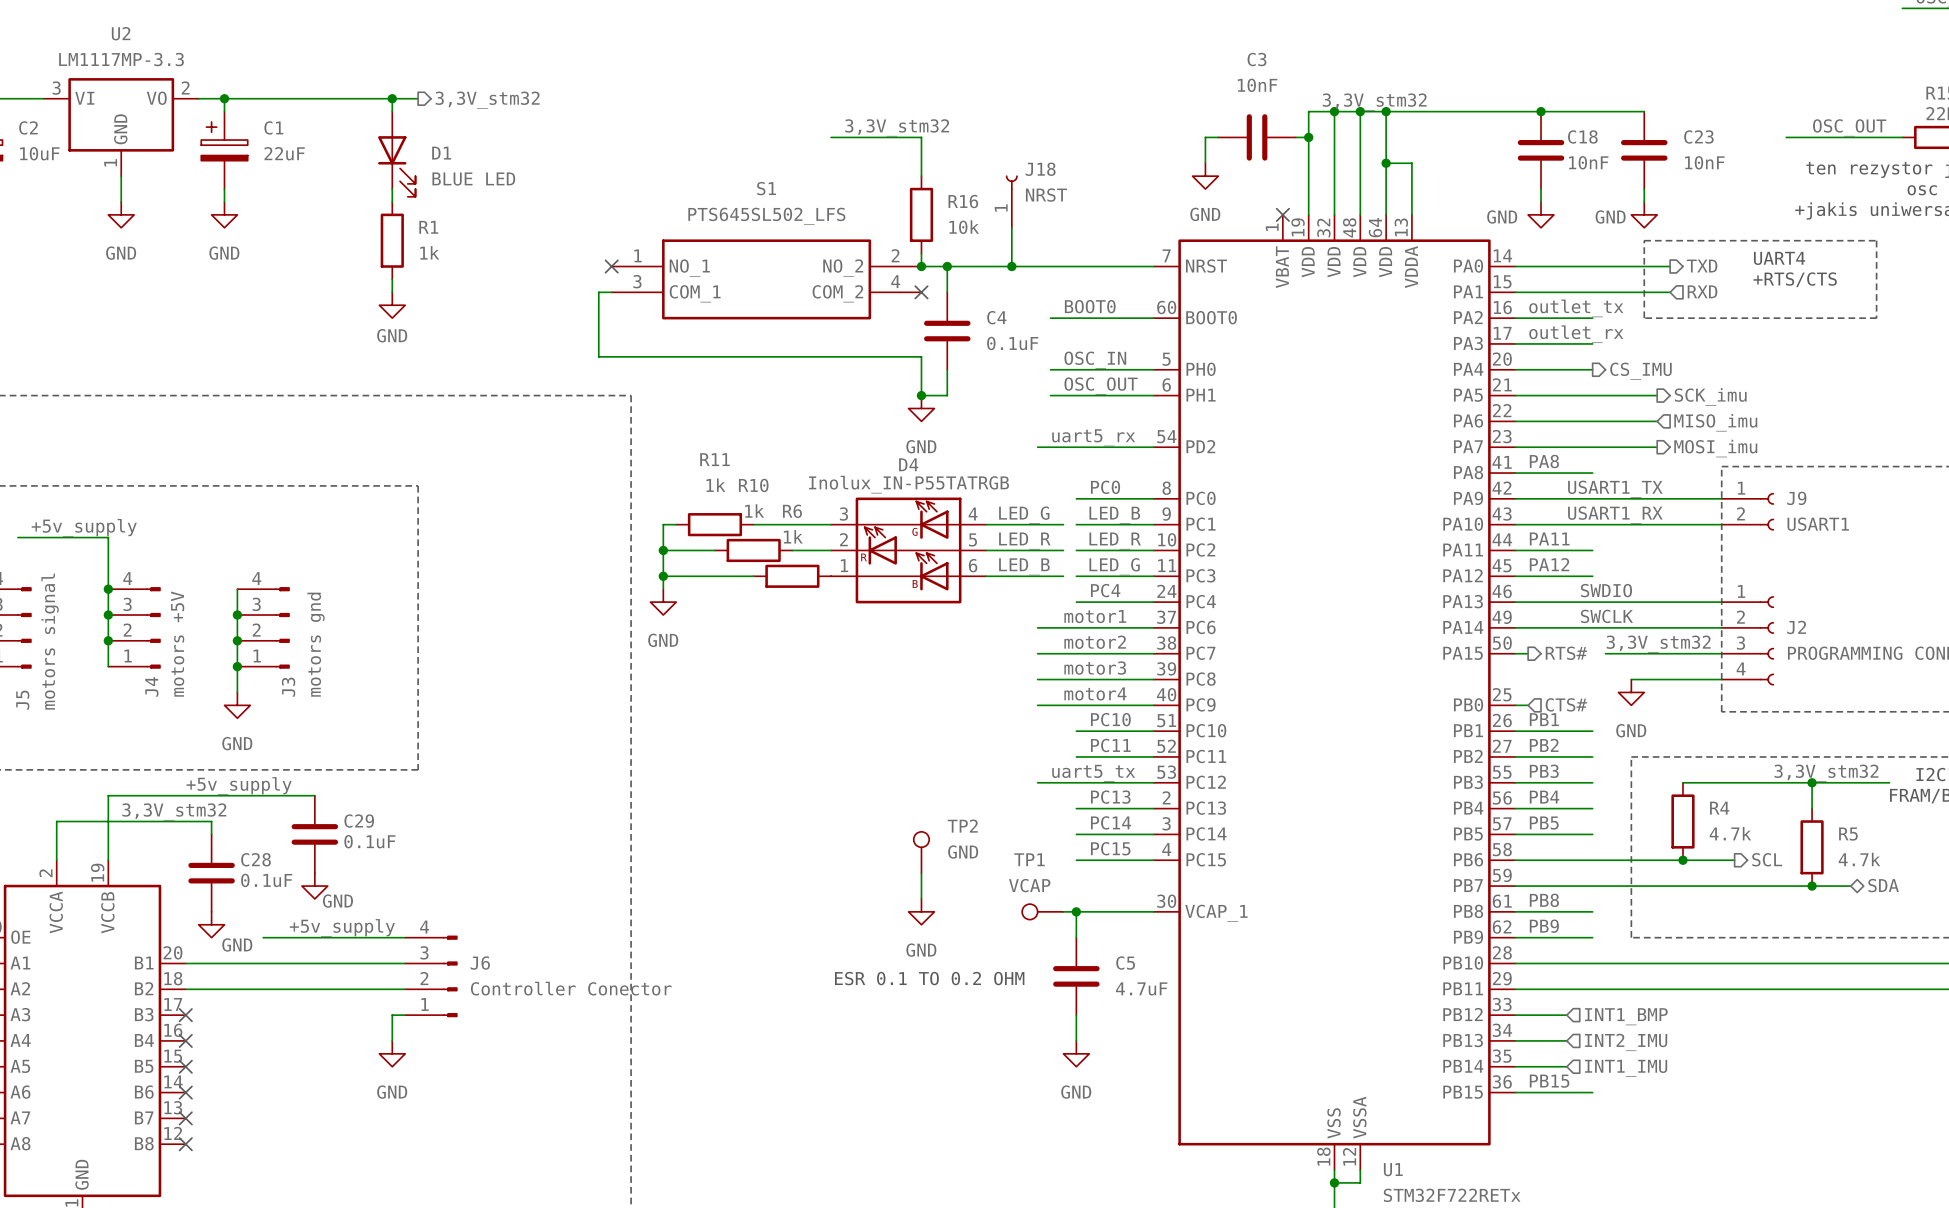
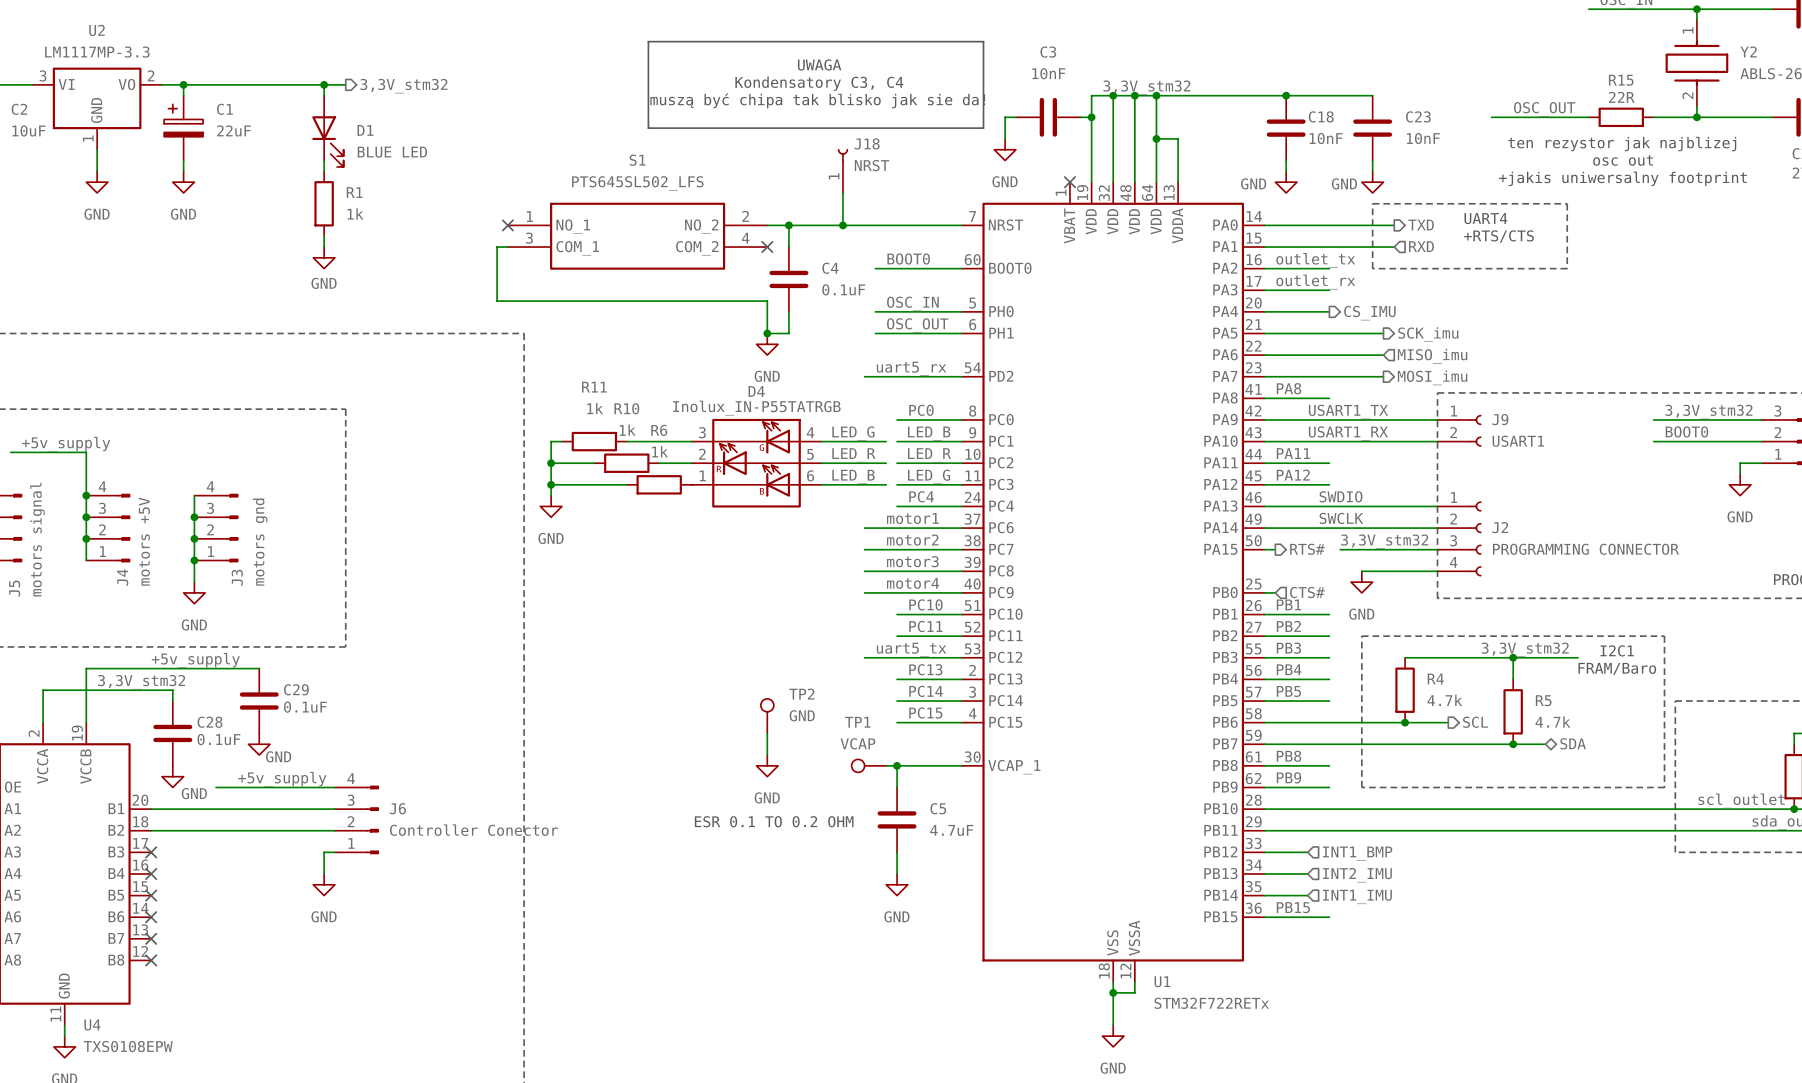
line: none -> (648, 41) (983, 41) (983, 128) (648, 128) (648, 41)
text: none -> UWAGA (819, 64)
text: none -> Kondensatory C3, C4 (819, 83)
text: none -> muszą być chipa tak blisko jak sie da! (817, 100)
label: 3,3V_stm32 (897, 127) -> none
wire: (831, 137) (921, 137) (921, 176) -> none
R16: 10k (921, 214) -> none
wire: (921, 253) (921, 266) -> none
junction: (921, 266) -> none

